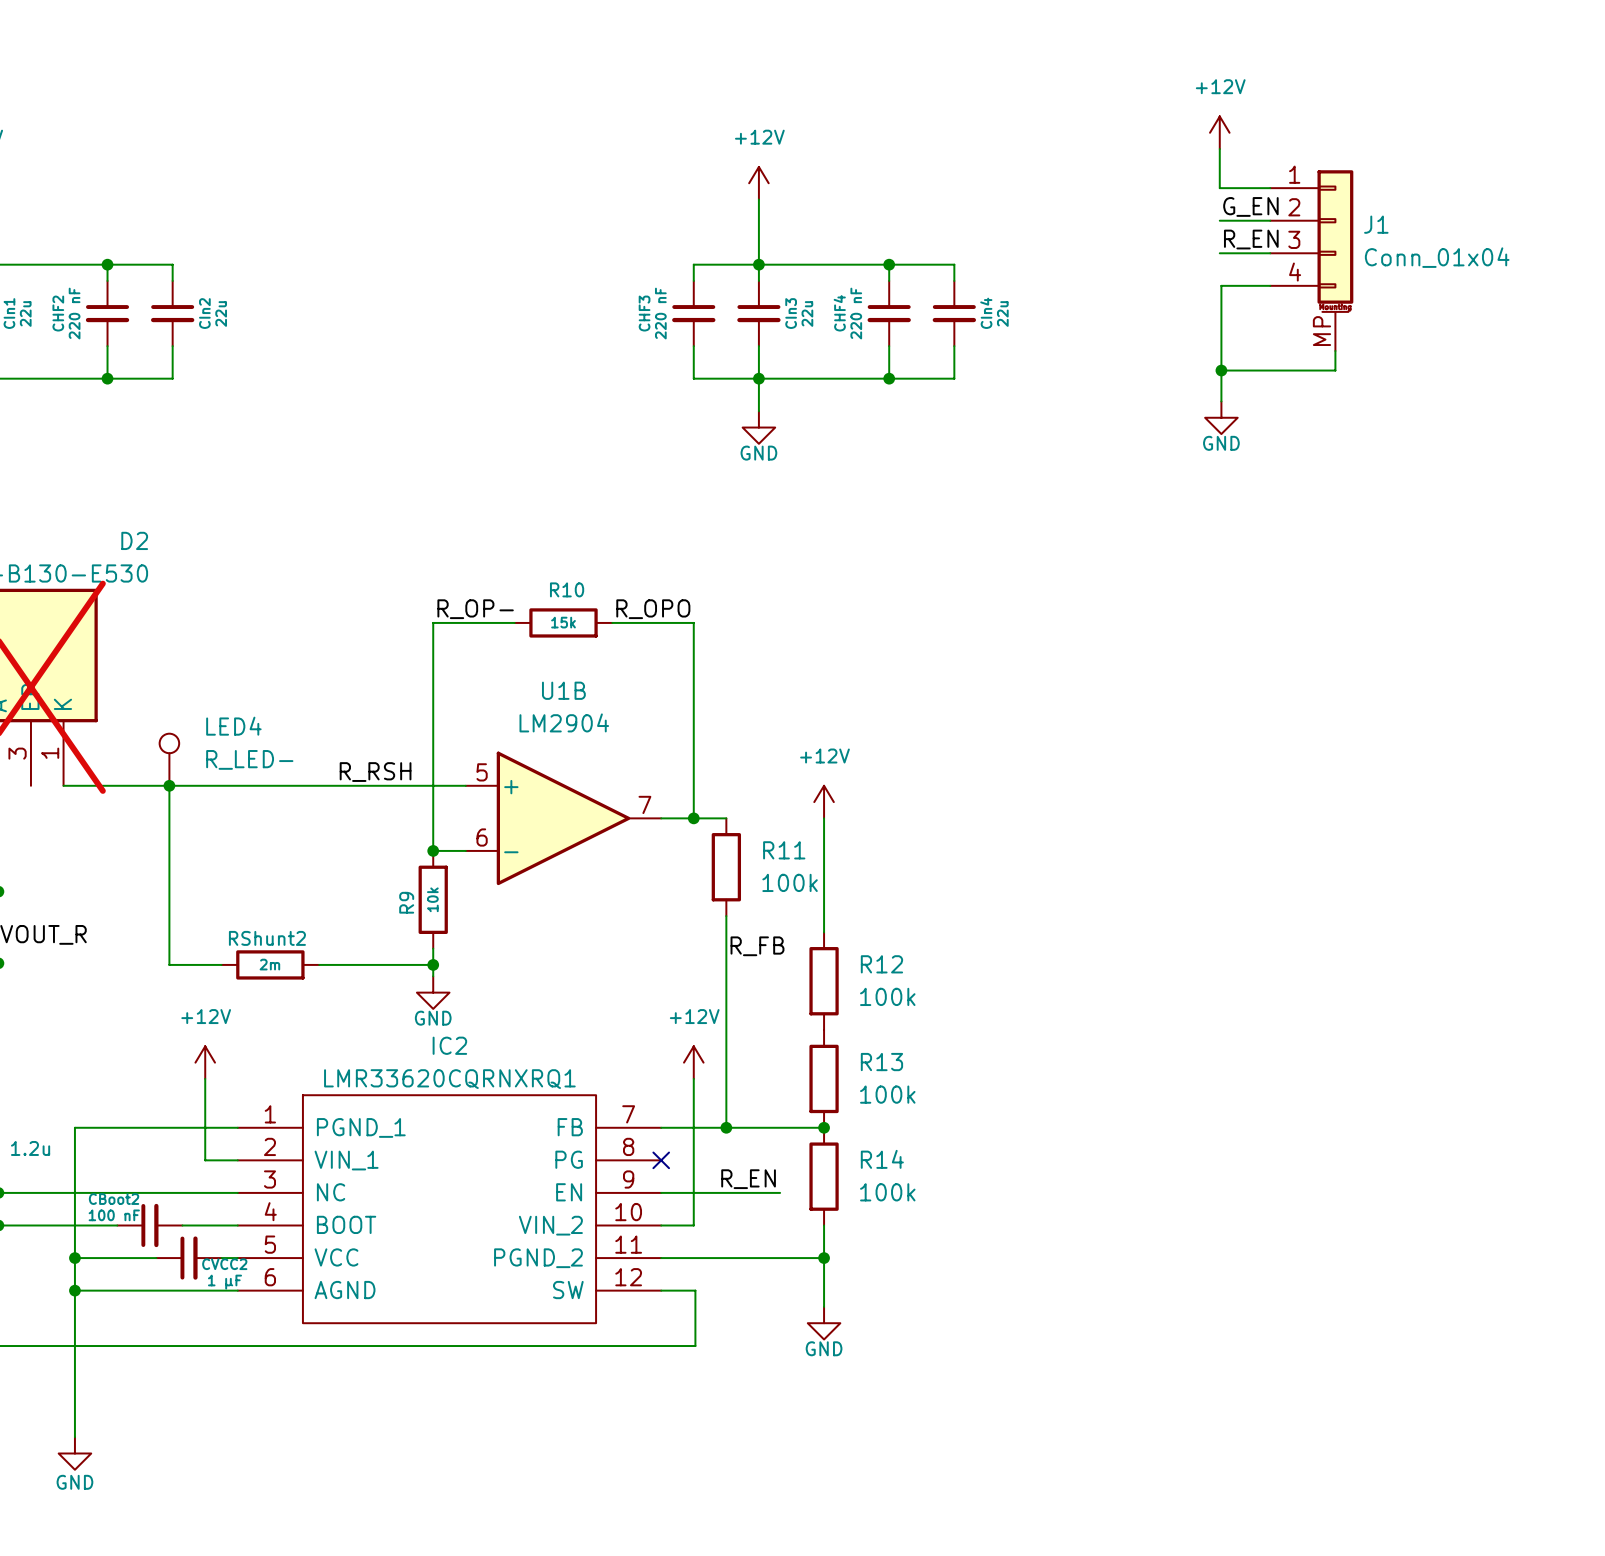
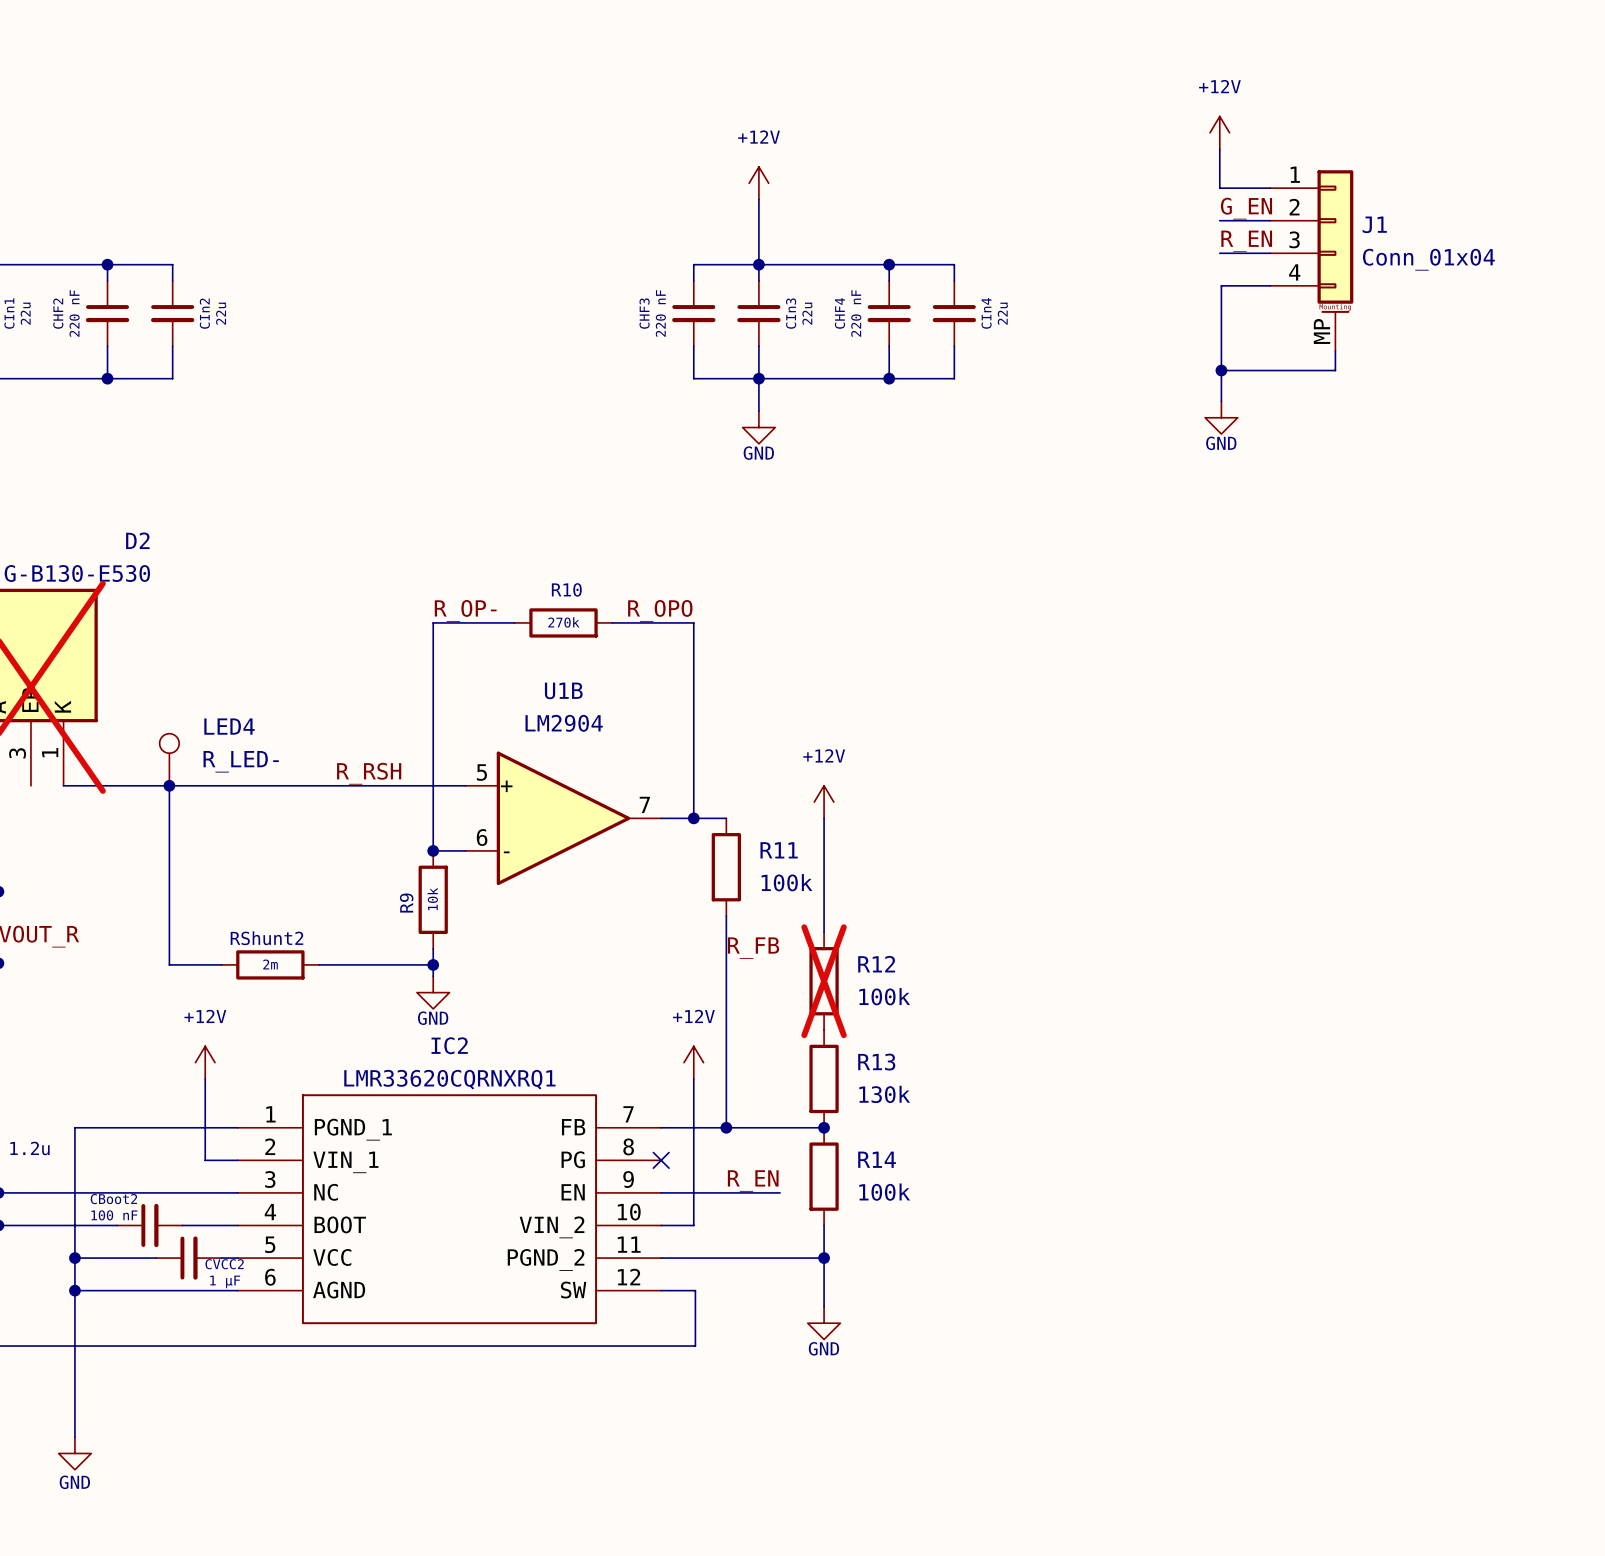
R10 value: 15k (563, 622) -> 270k (563, 622)
R12 do-not-place cross: none -> (824, 981)
R13 value: 100k (887, 1094) -> 130k (884, 1094)

